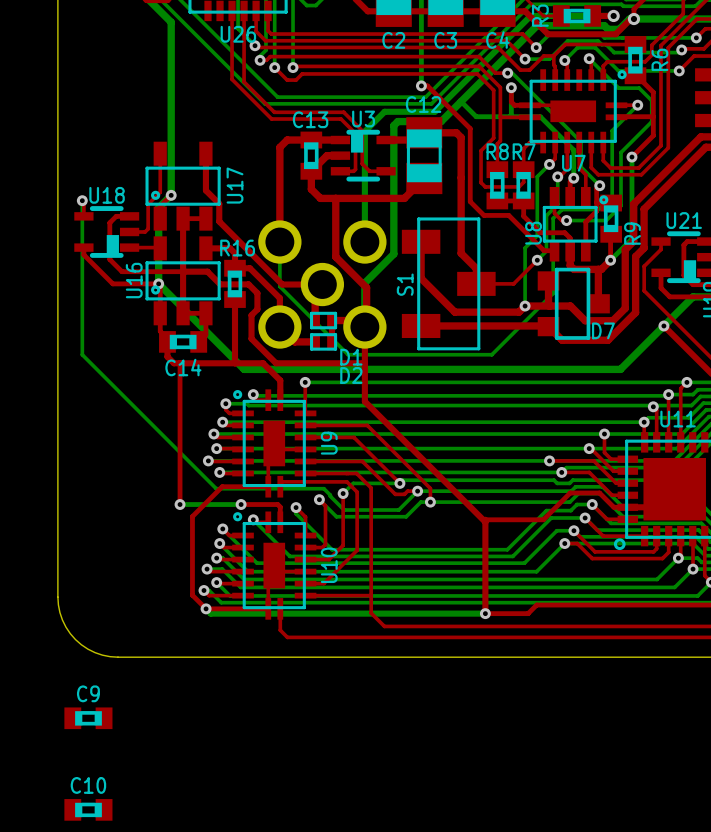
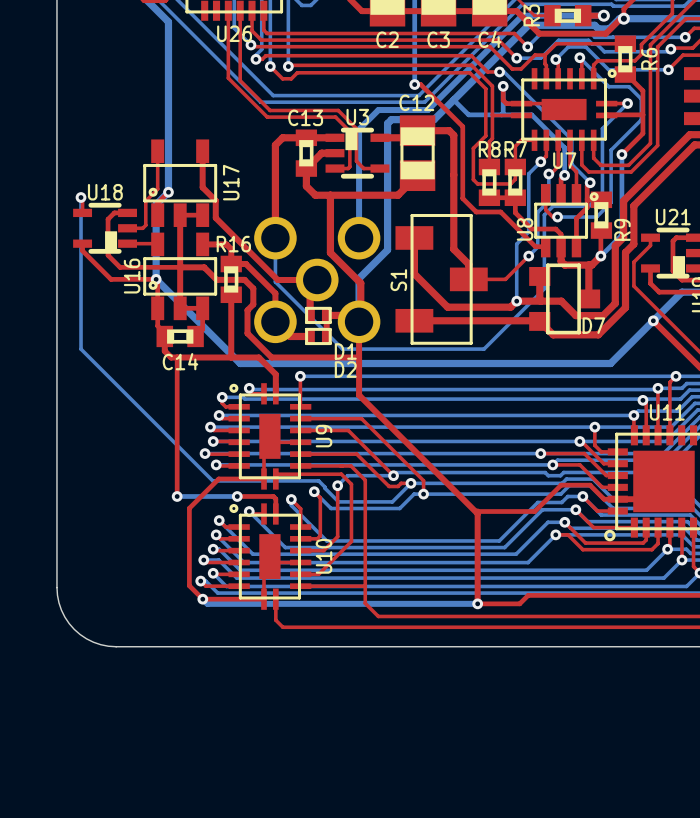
C9: (88, 718) -> none
C10: (88, 809) -> none

